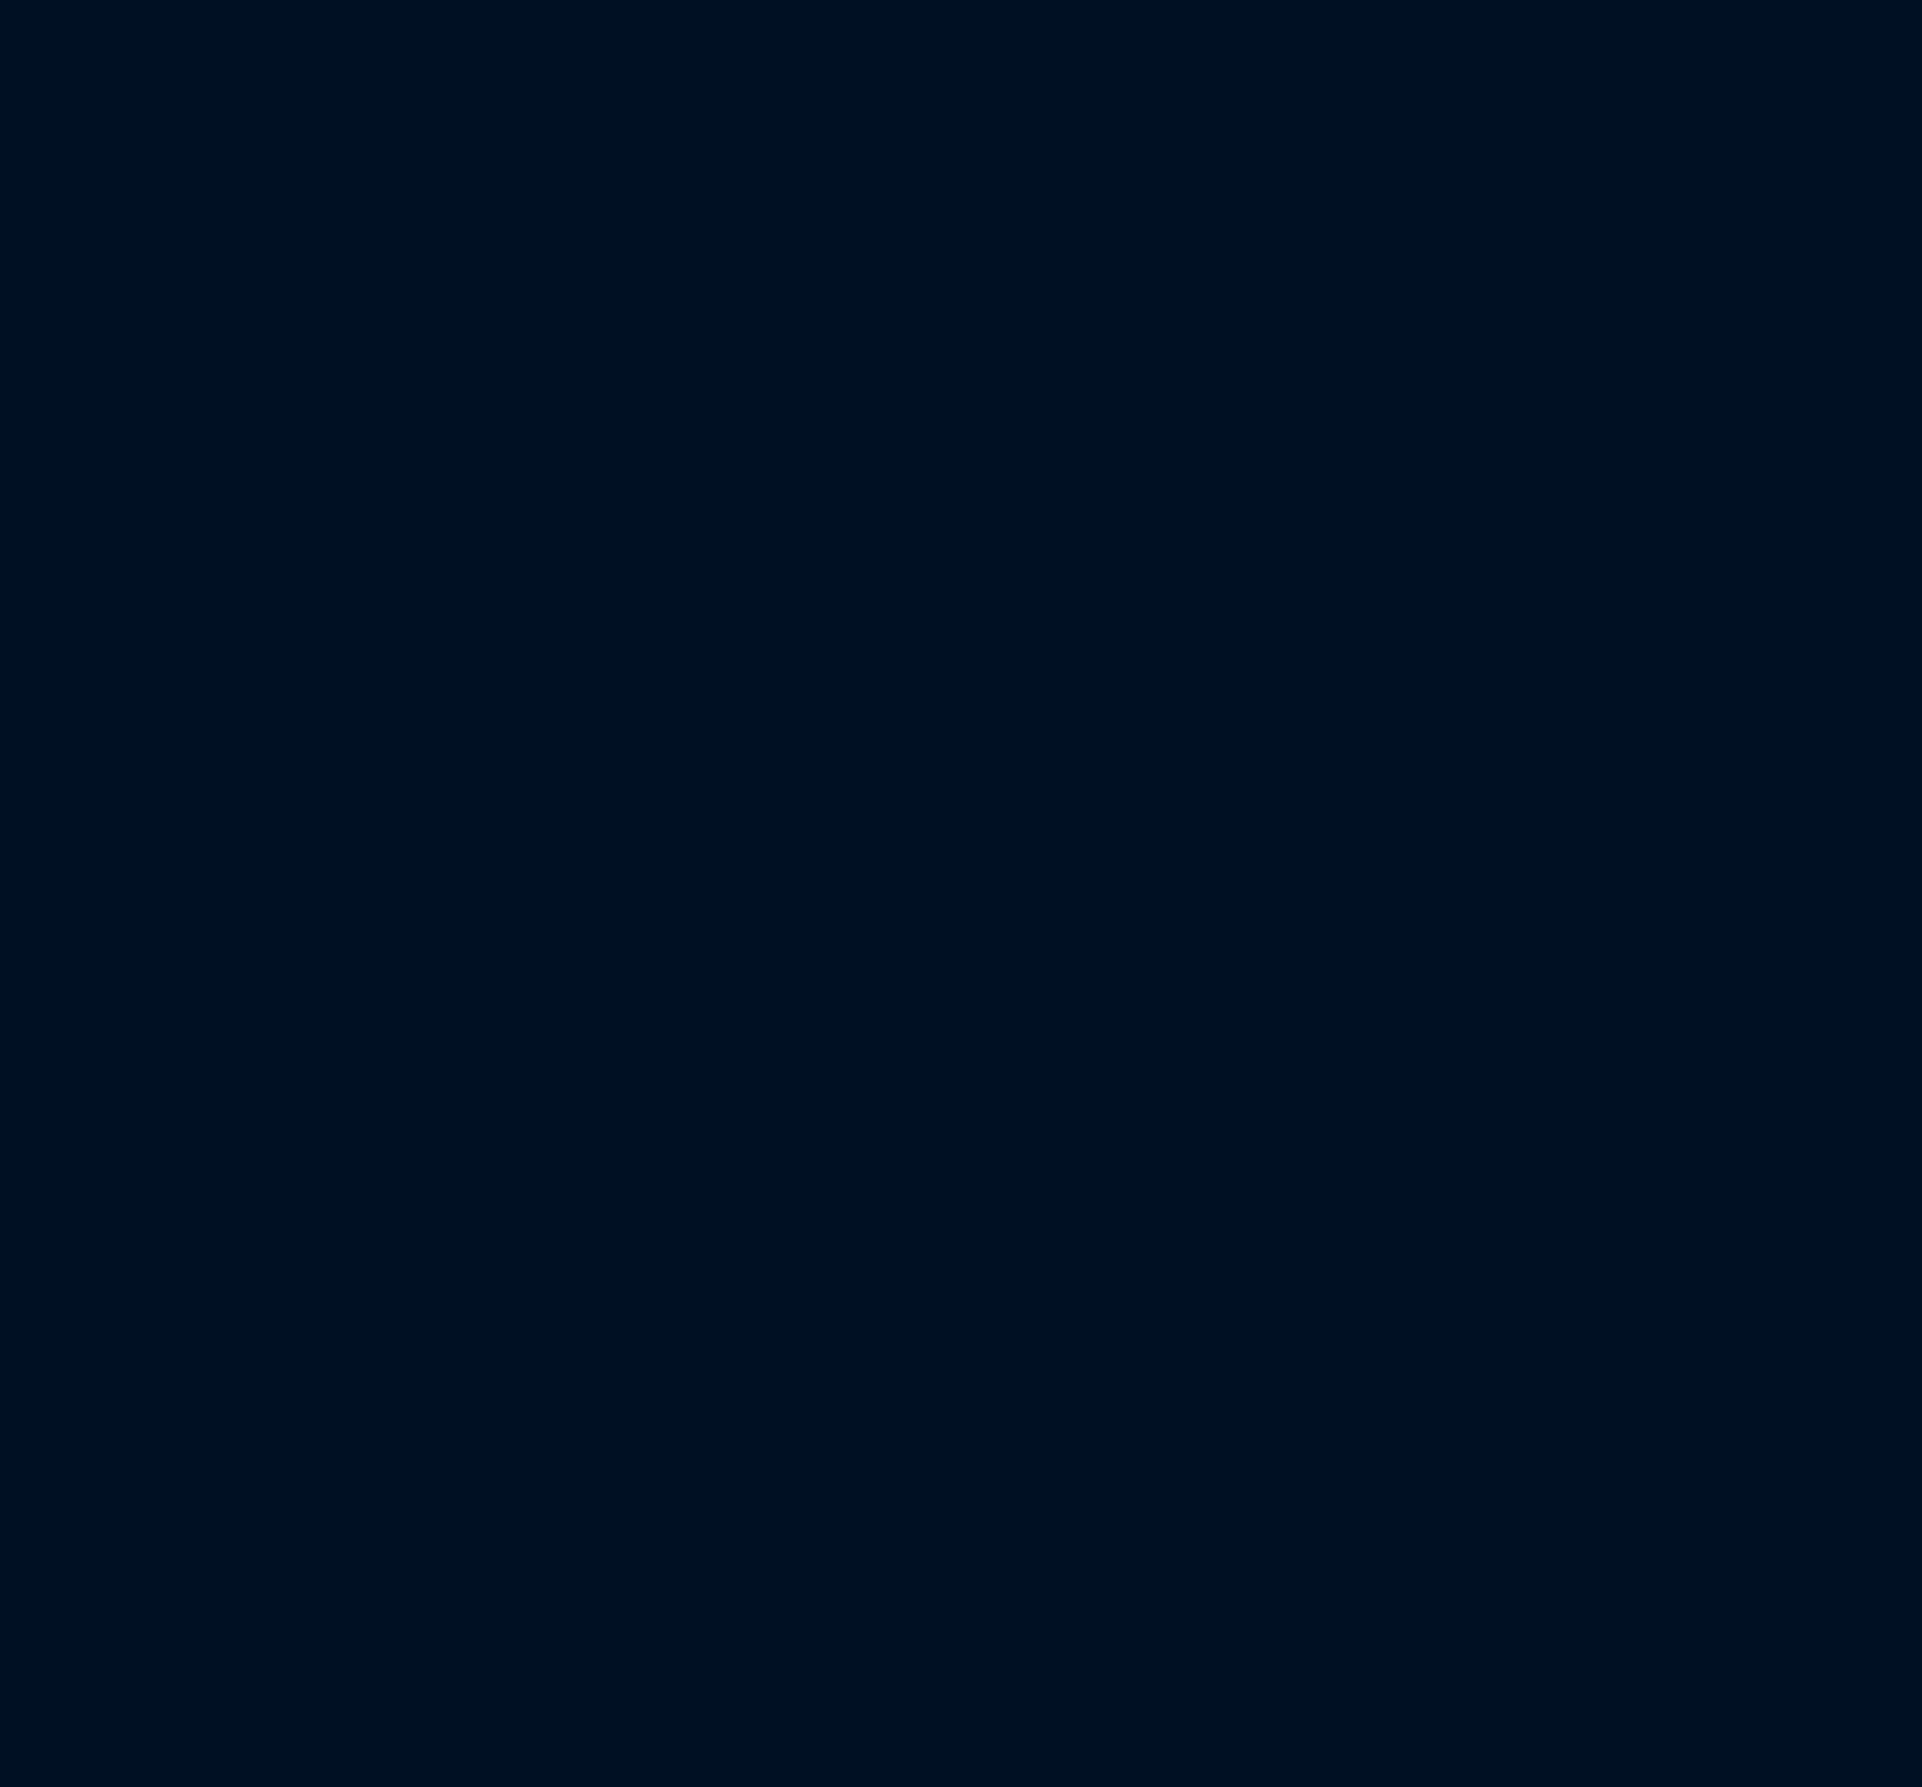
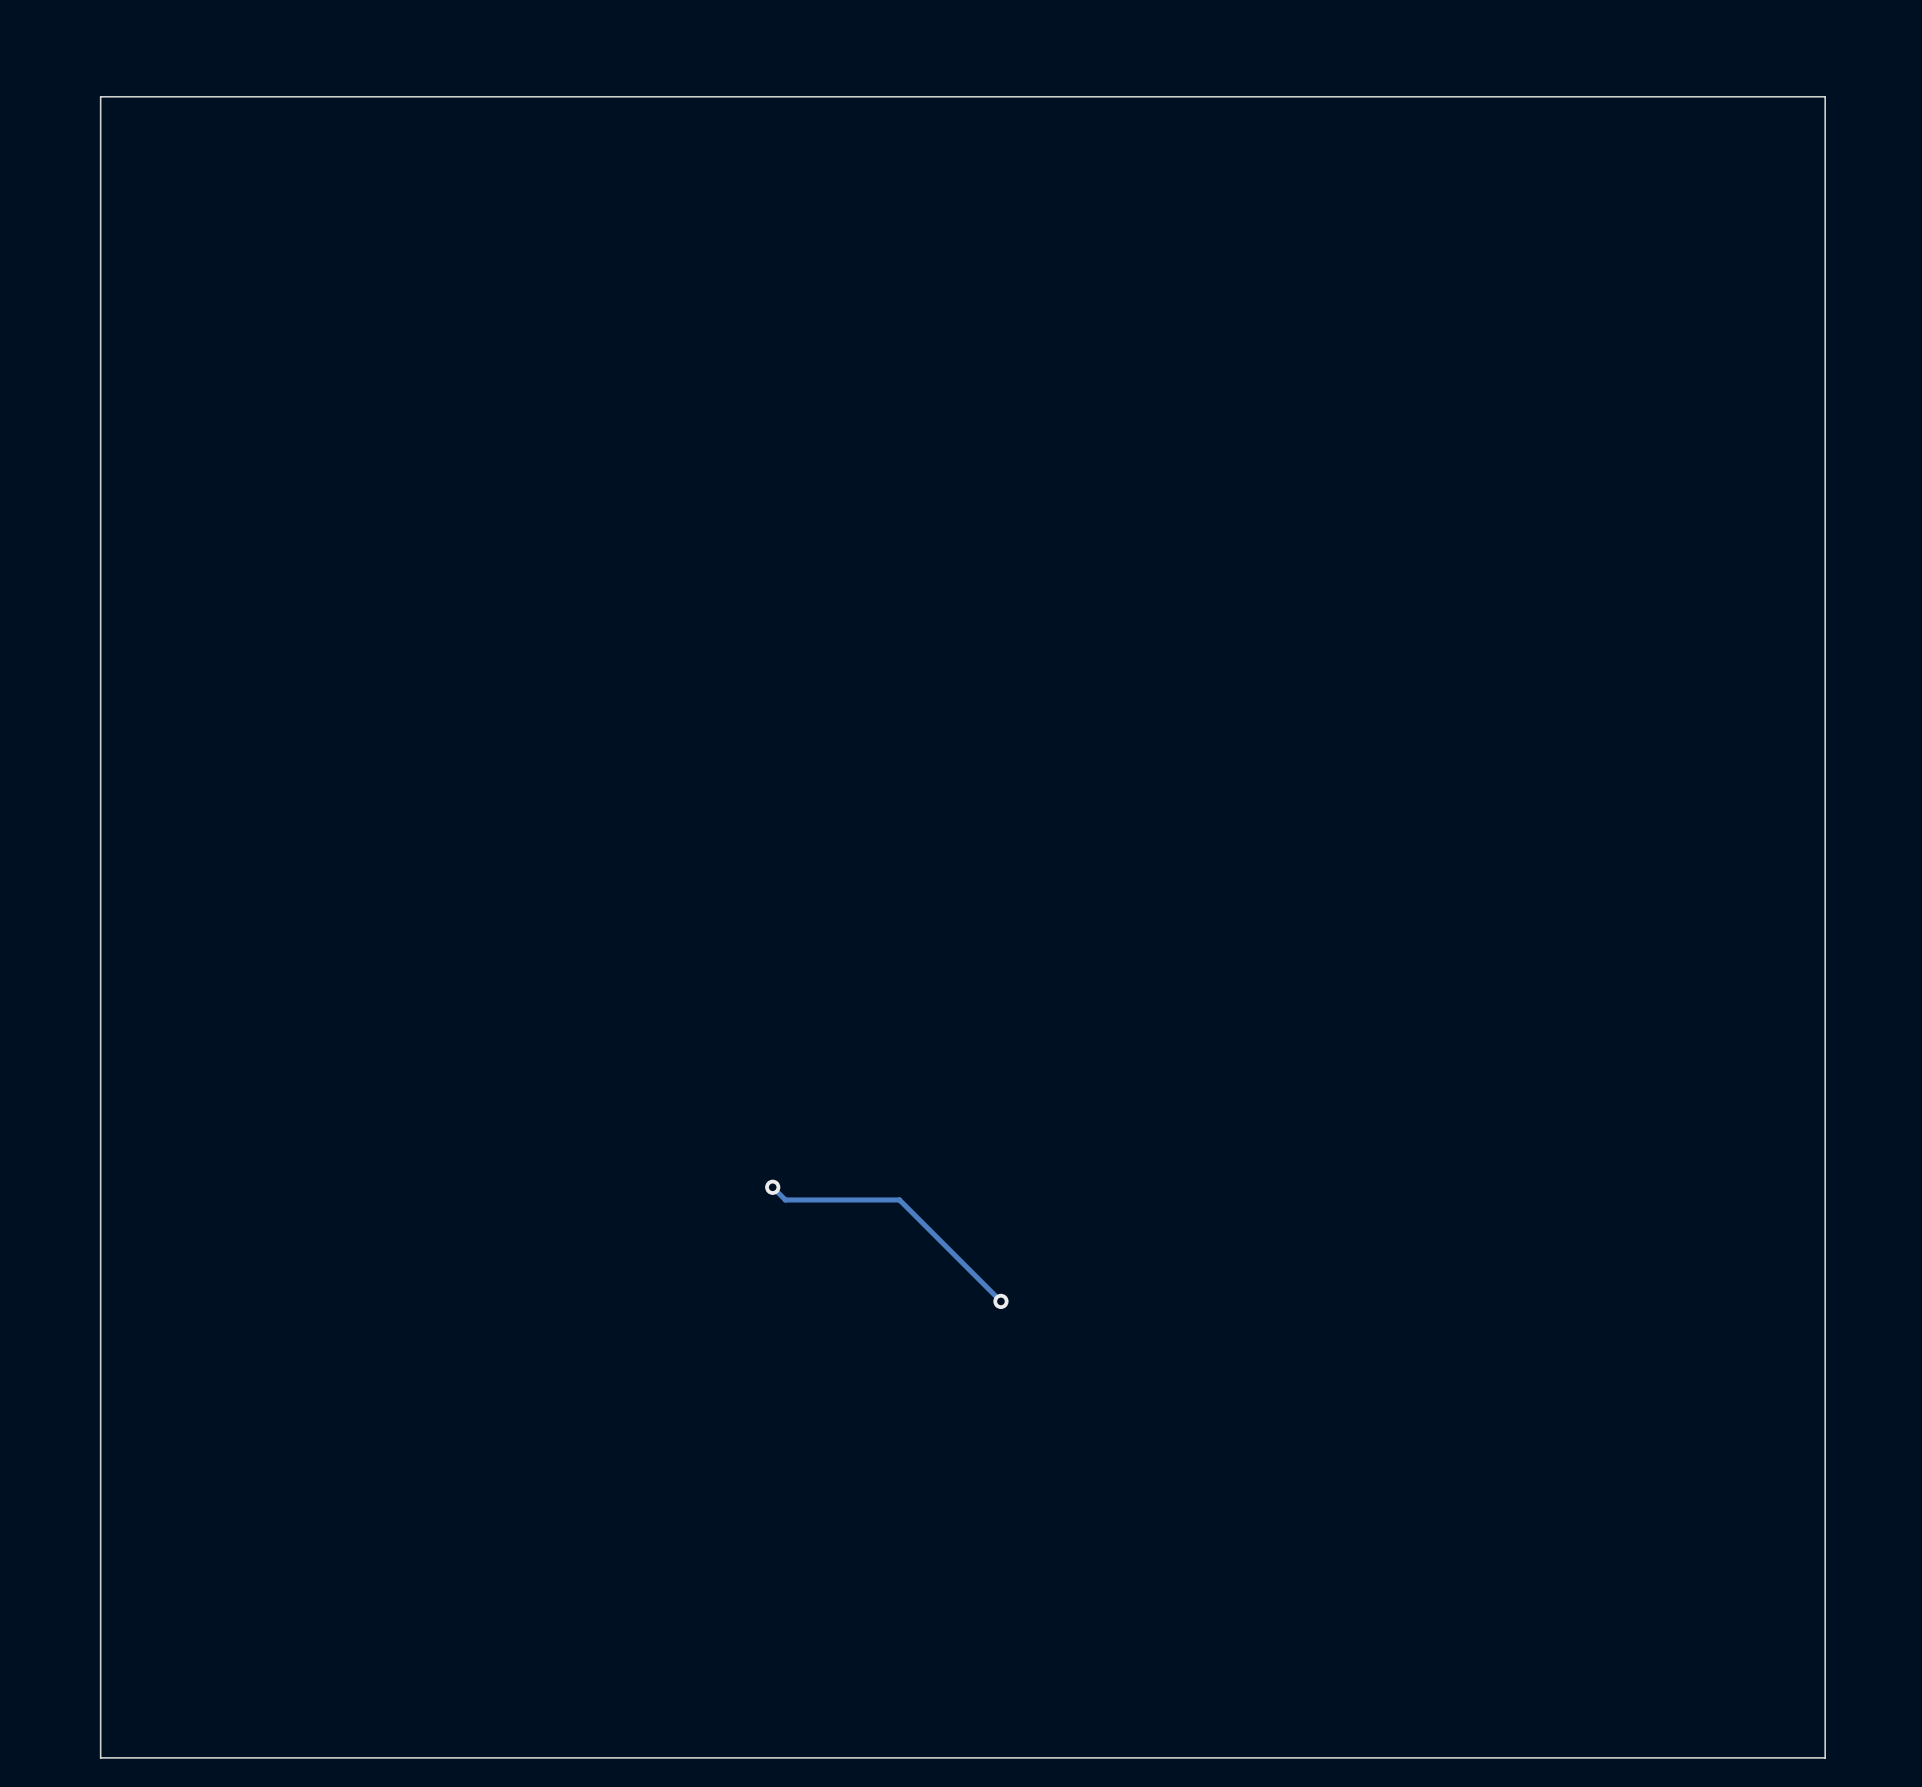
board edge: none -> (1825, 96) (100, 96) (100, 1757) (1825, 1757) (1825, 96)
track: none -> (772, 1187) (785, 1199) (899, 1199) (1000, 1301)
via: none -> (772, 1187)
via: none -> (1000, 1301)

